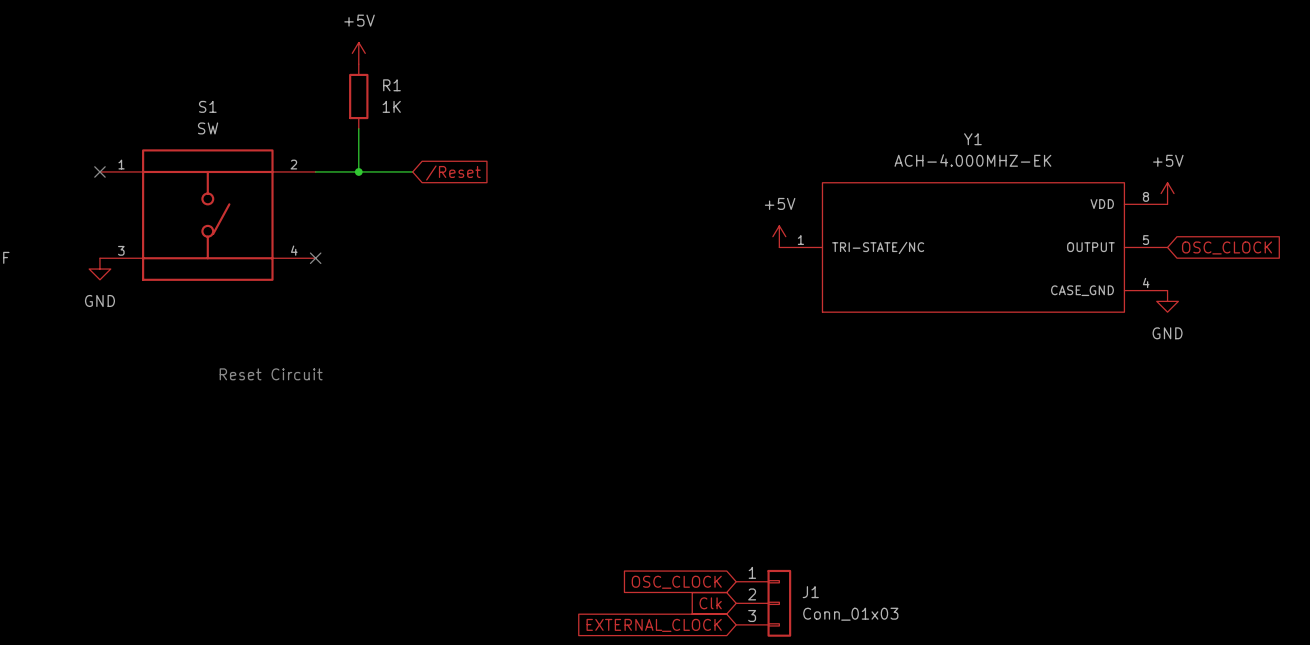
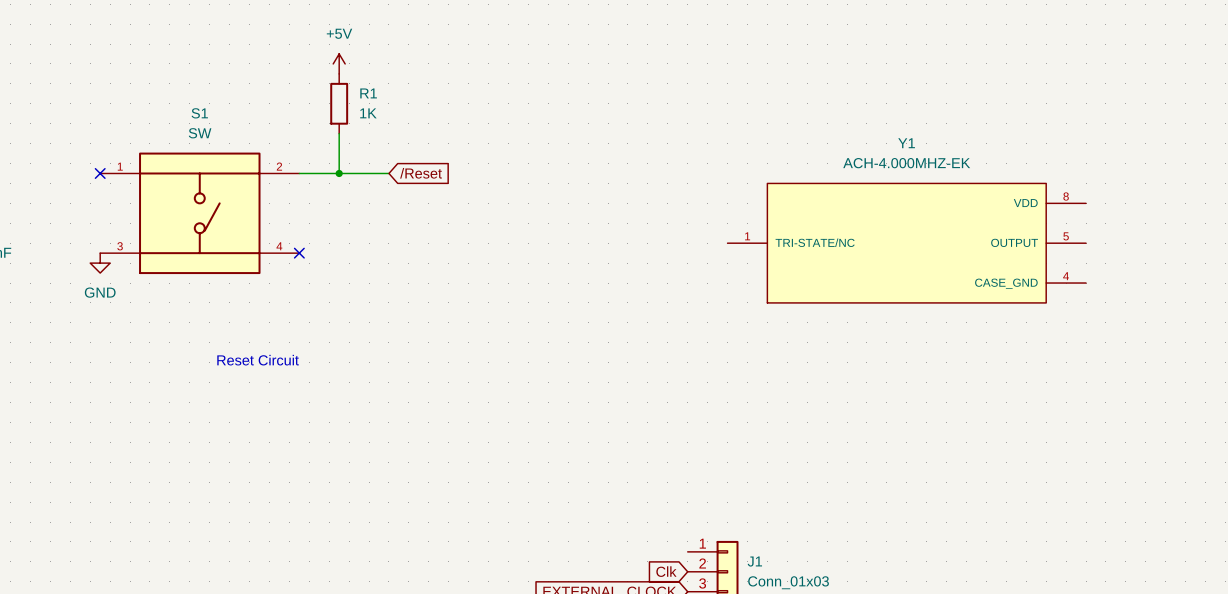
power symbol: +5V (1167, 193) -> none
power symbol: +5V (779, 236) -> none
global label: OSC_CLOCK (1227, 247) -> none
power symbol: GND (1167, 301) -> none
global label: OSC_CLOCK (676, 582) -> none

